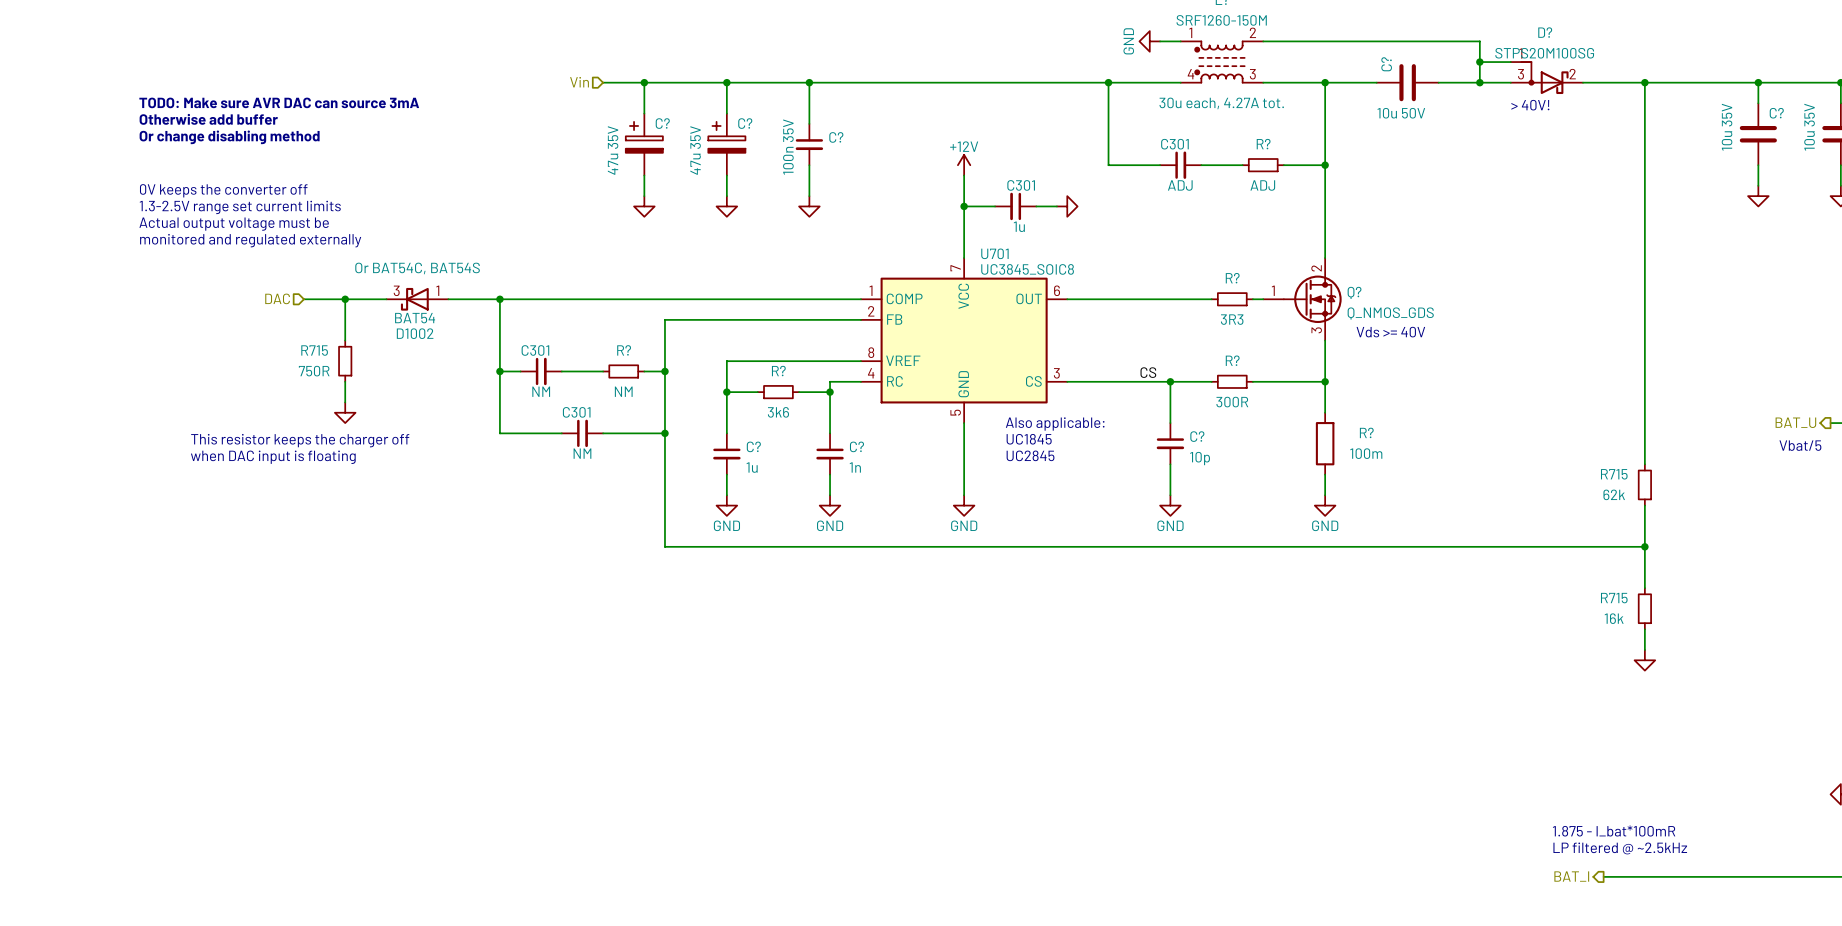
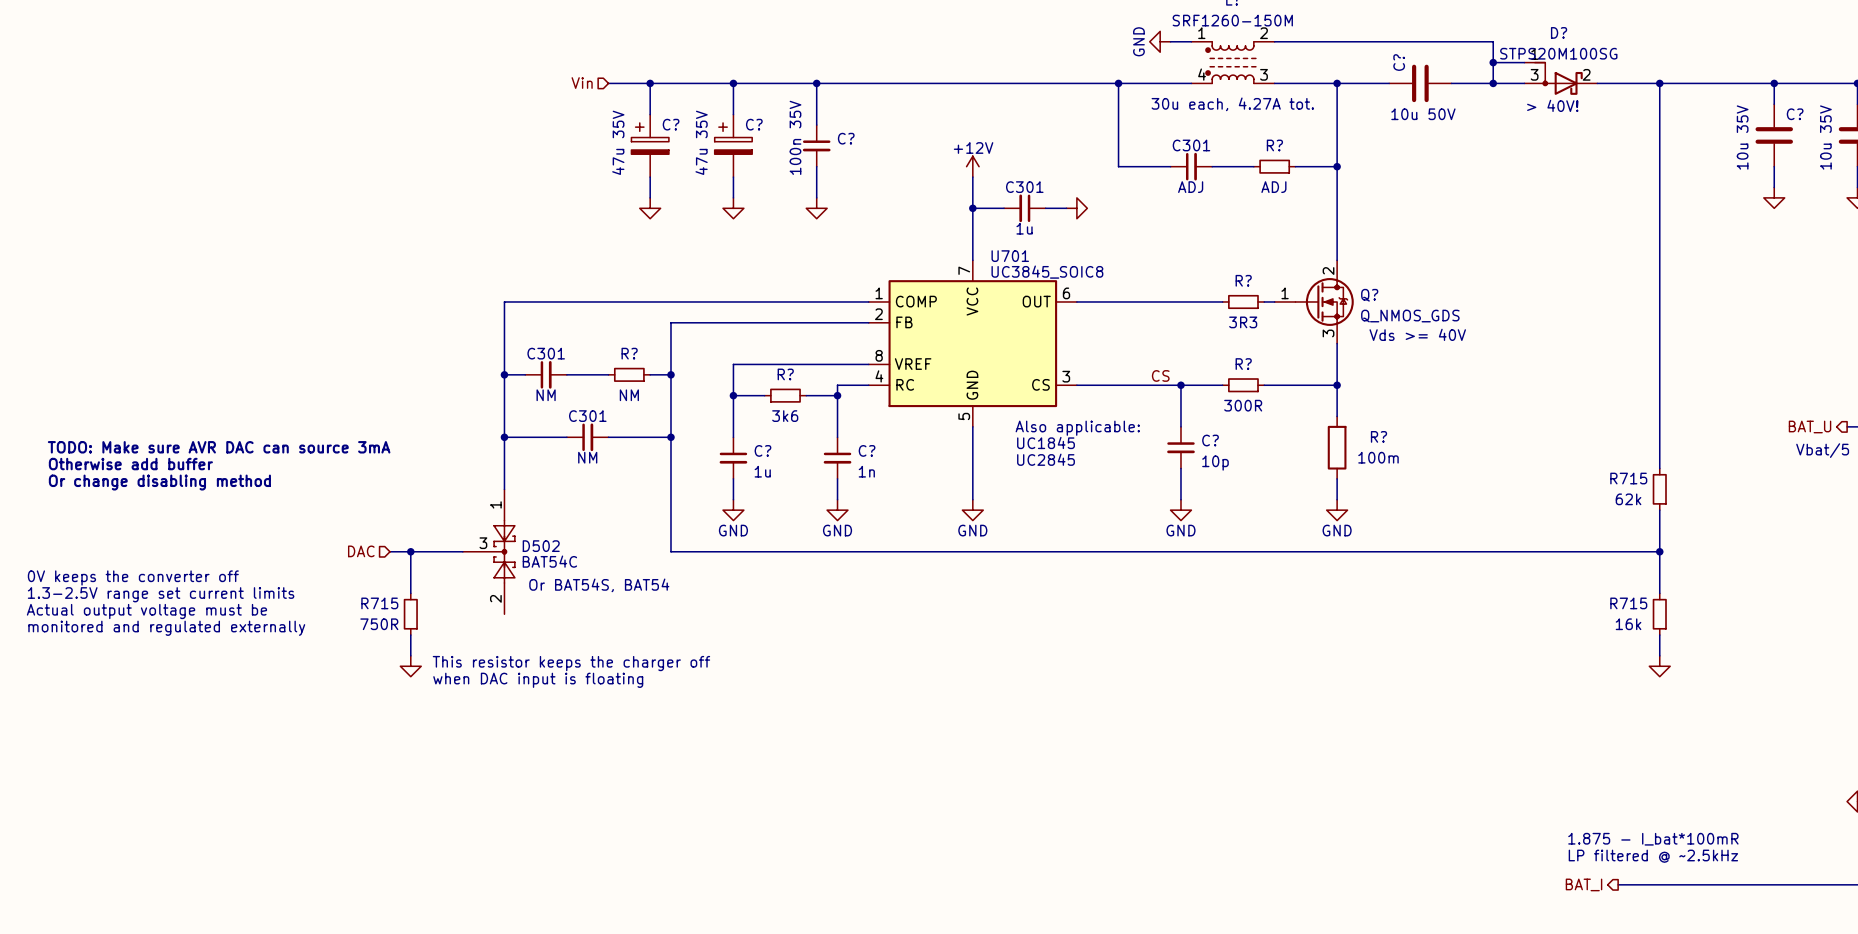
text: TODO: Make sure AVR DAC can source 3mA (279, 102) -> none
text: Otherwise add buffer (208, 119) -> none
text: Or change disabling method (229, 137) -> none
text: 0V keeps the converter off (223, 190) -> none
text: 1.3-2.5V range set current limits (240, 207) -> none
text: Actual output voltage must be (234, 224) -> none
text: monitored and regulated externally (250, 240) -> none
hierarchical label: DAC (277, 298) -> none
wire: (303, 299) (386, 299) -> none
wire: (345, 299) (345, 340) -> none
junction: (345, 299) -> none
D1002: BAT54 (417, 299) -> none
wire: (448, 299) (499, 299) -> none
junction: (499, 299) -> none
R715: 750R (345, 361) -> none
wire: (345, 381) (345, 402) -> none
power symbol: (345, 412) -> none
wire: none -> (504, 437) (504, 489)
junction: none -> (504, 437)
text: This resistor keeps the charger off (300, 440) -> none
text: none -> TODO: Make sure AVR DAC can source 3mA (219, 447)
text: when DAC input is floating (273, 457) -> none
text: none -> Otherwise add buffer (130, 464)
text: none -> Or change disabling method (159, 482)
hierarchical label: none -> DAC (361, 551)
wire: none -> (389, 551) (462, 551)
wire: none -> (410, 551) (410, 593)
junction: none -> (410, 551)
D502: none -> BAT54C (488, 551)
text: none -> 0V keeps the converter off (133, 577)
text: none -> Or BAT54S, BAT54 (599, 585)
text: none -> 1.3-2.5V range set current limits (161, 594)
text: none -> Actual output voltage must be (146, 611)
R715: none -> 750R (410, 614)
text: none -> monitored and regulated externally (166, 628)
wire: none -> (410, 635) (410, 655)
text: none -> This resistor keeps the charger off (571, 663)
power symbol: none -> (410, 666)
text: none -> when DAC input is floating (538, 680)

